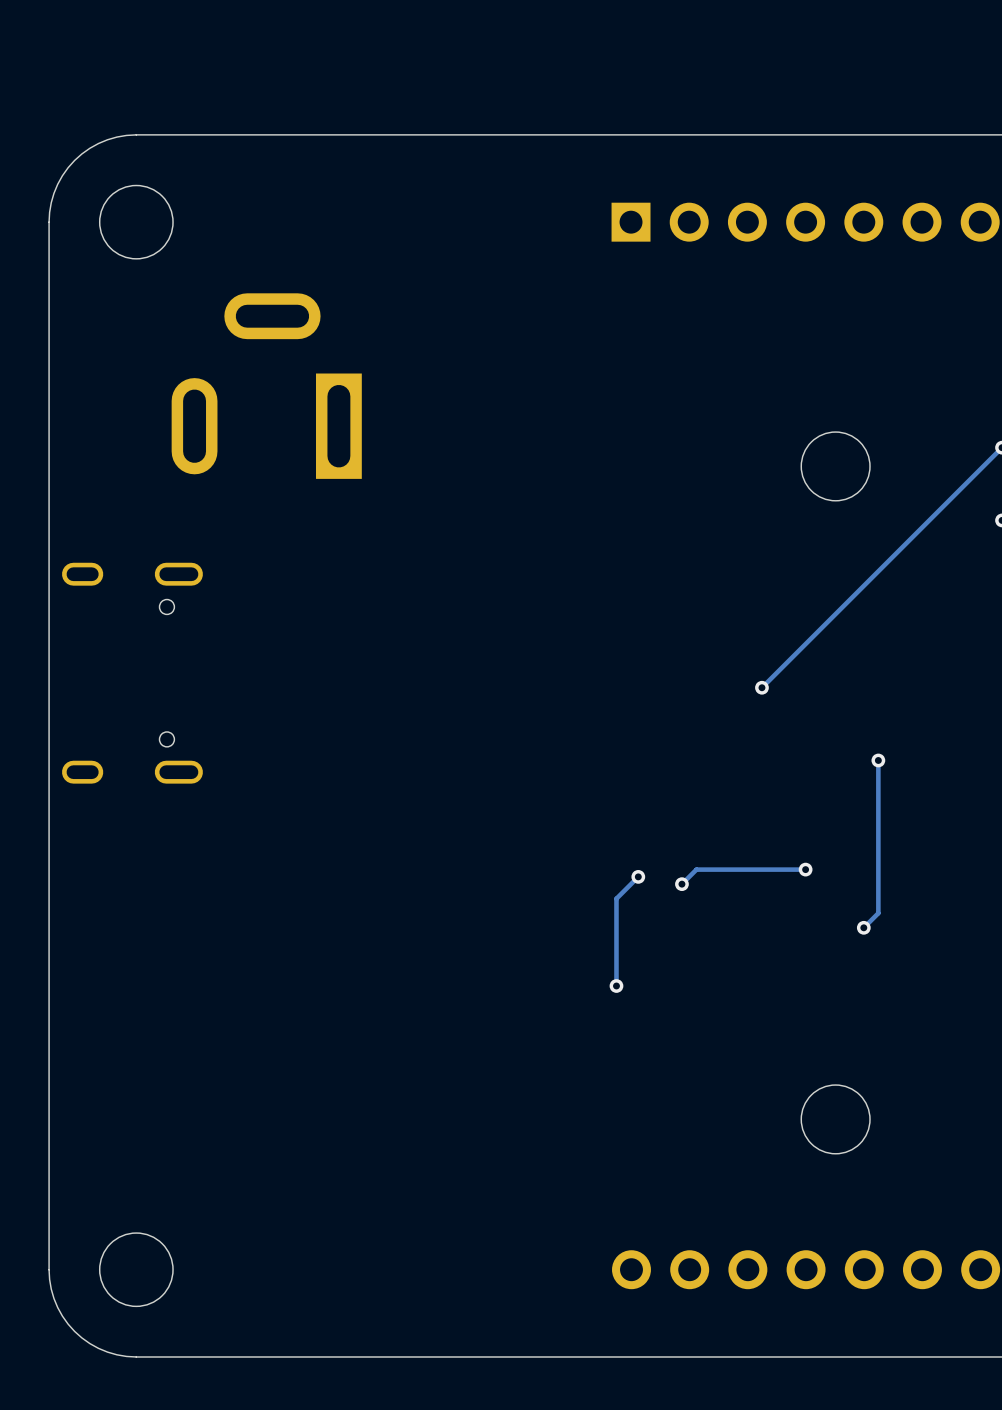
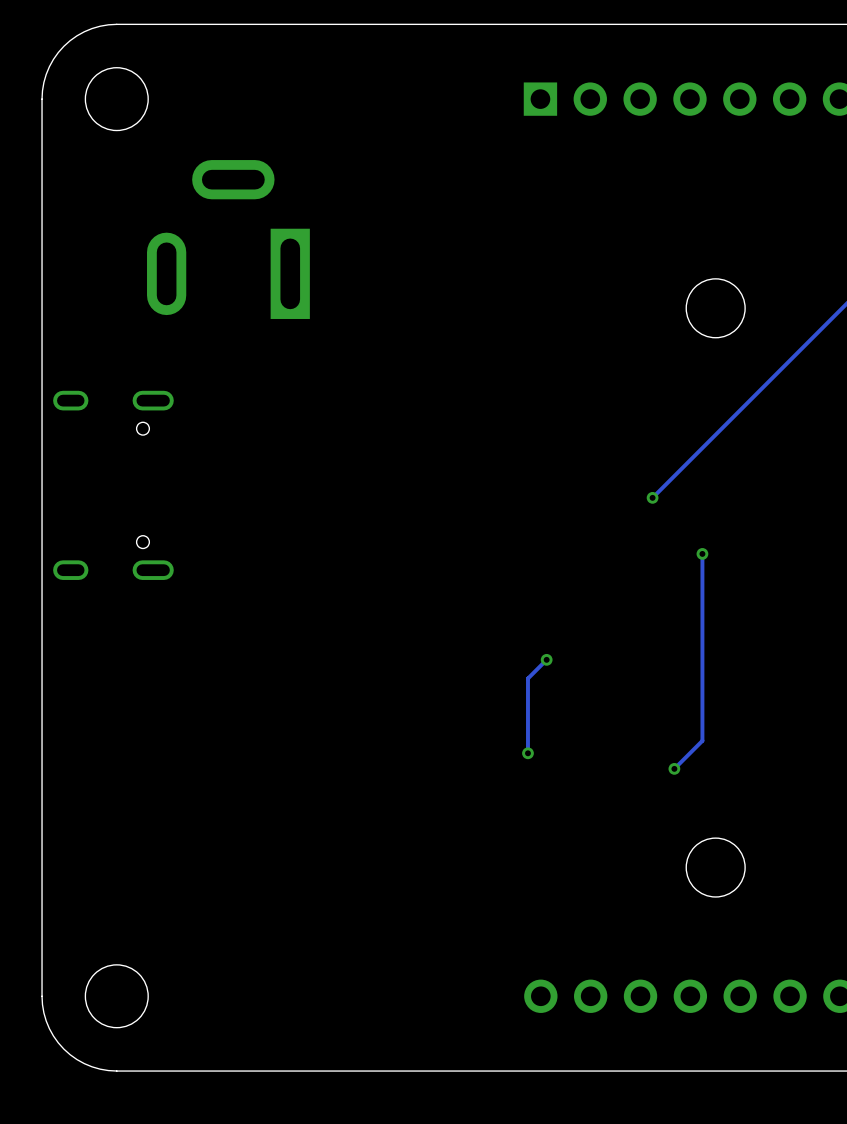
track: none -> (702, 553) (702, 740) (674, 768)
via: none -> (702, 553)
track: (878, 760) (878, 913) (863, 927) -> none
via: (878, 760) -> none
track: (805, 869) (696, 869) (681, 884) -> none
via: (805, 869) -> none
via: (681, 884) -> none
via: (863, 927) -> none
via: none -> (674, 768)

